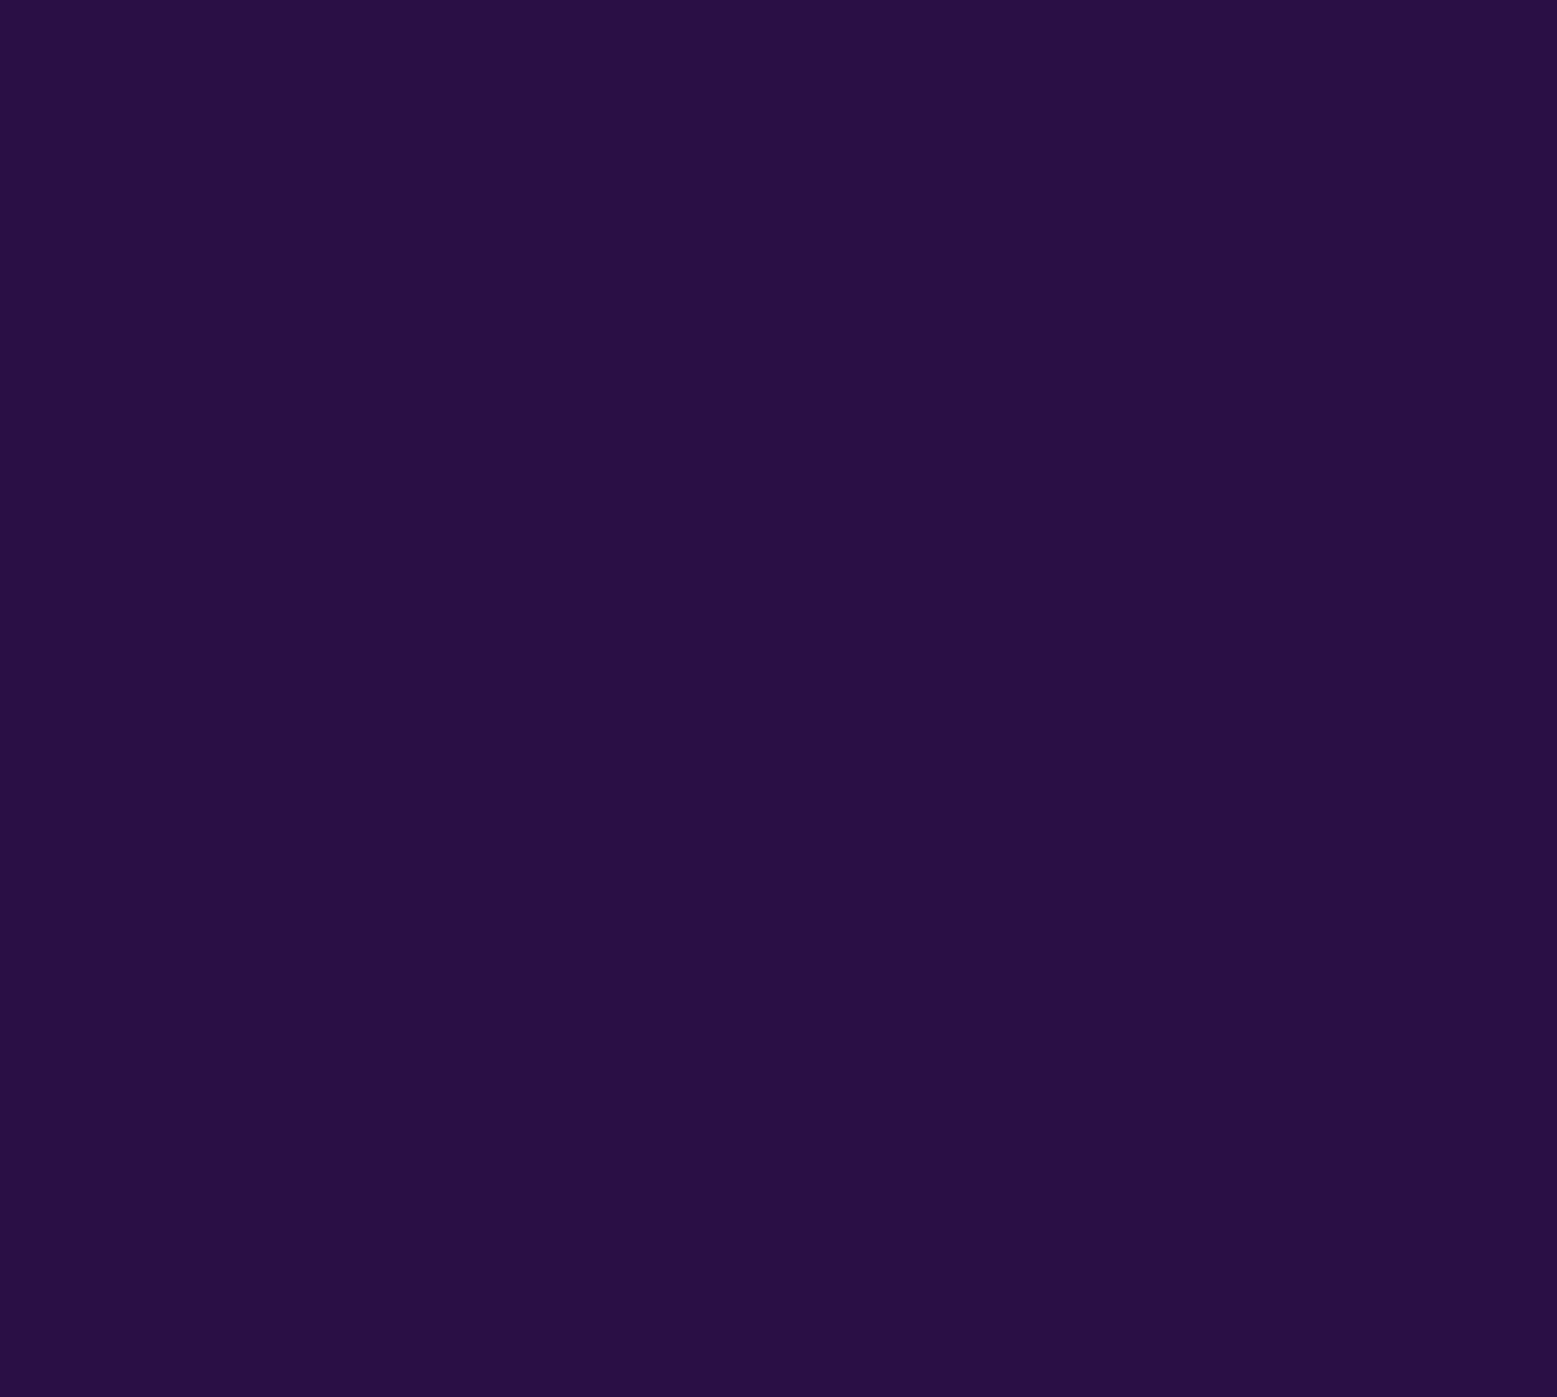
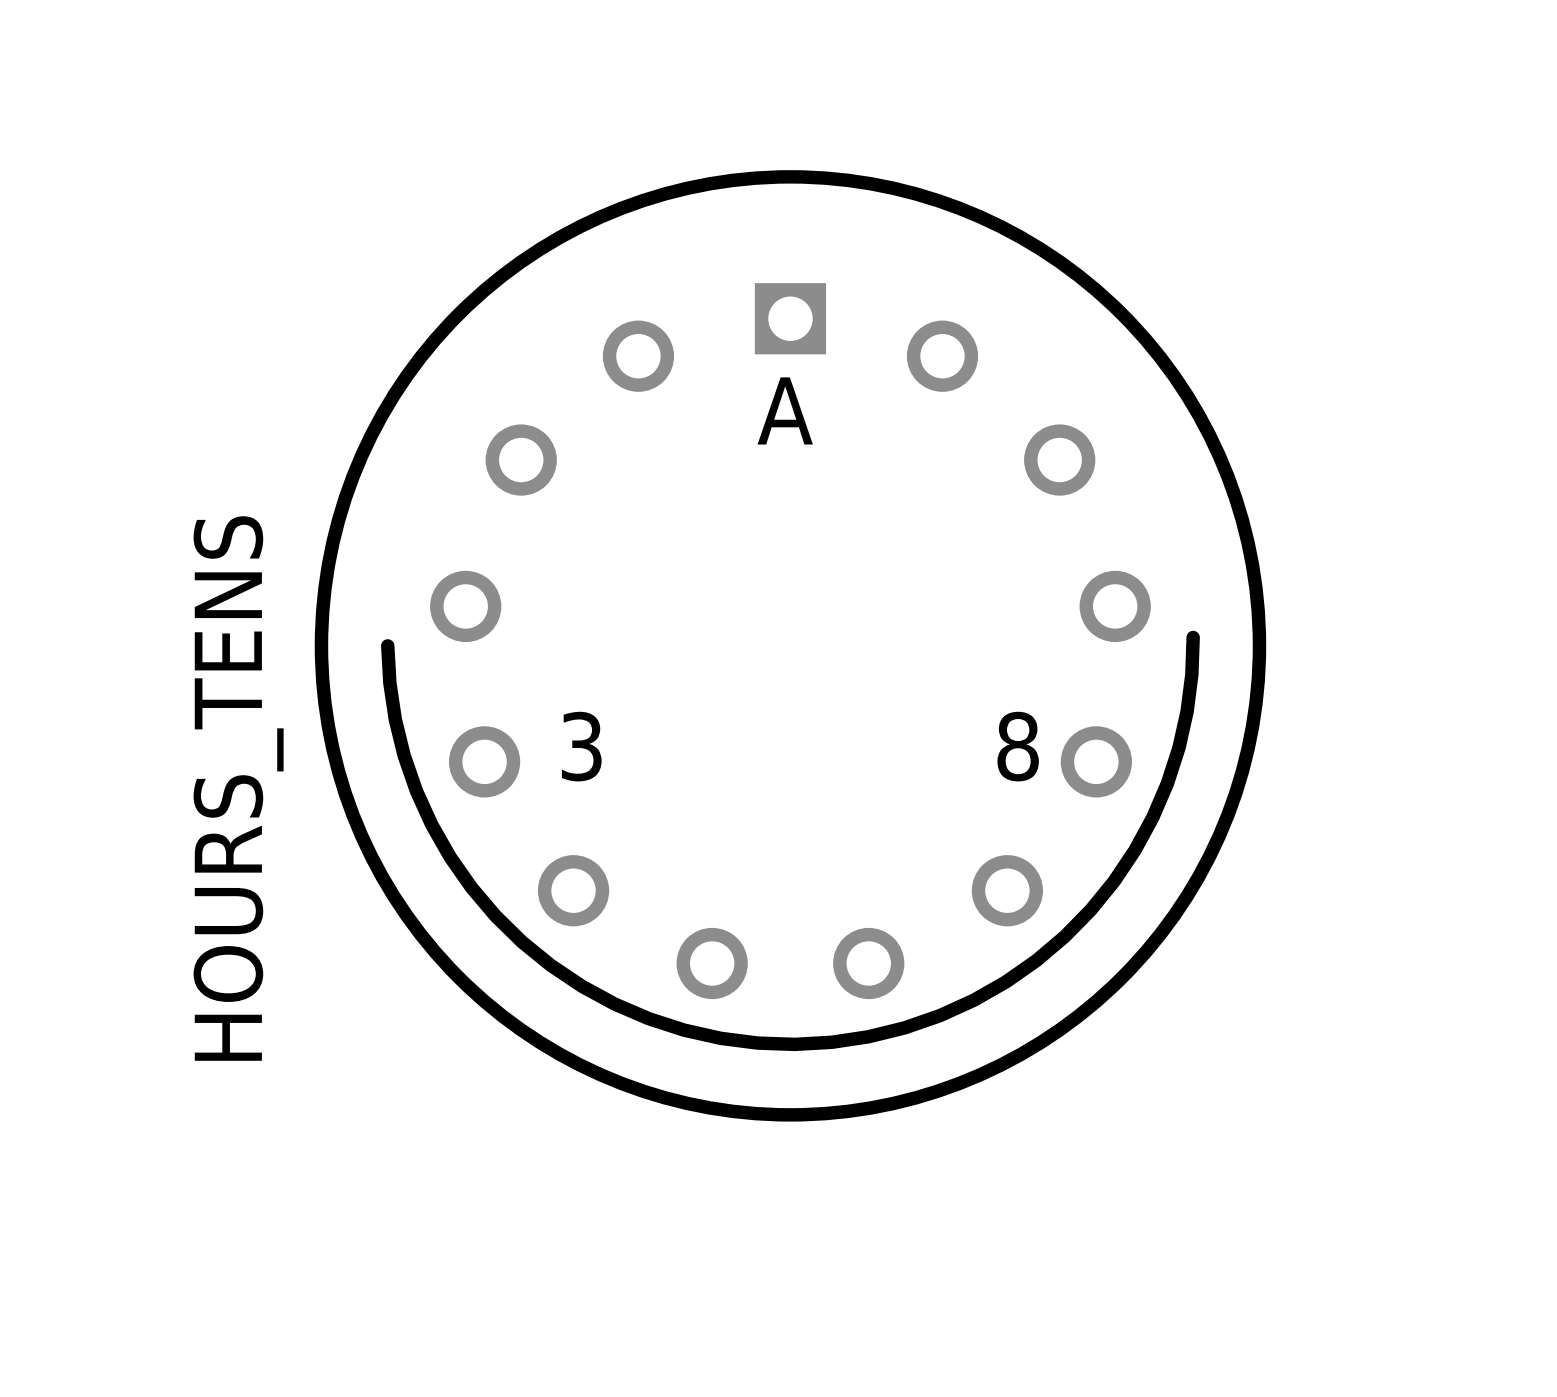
HOURS_TENS: none -> (790, 645)

